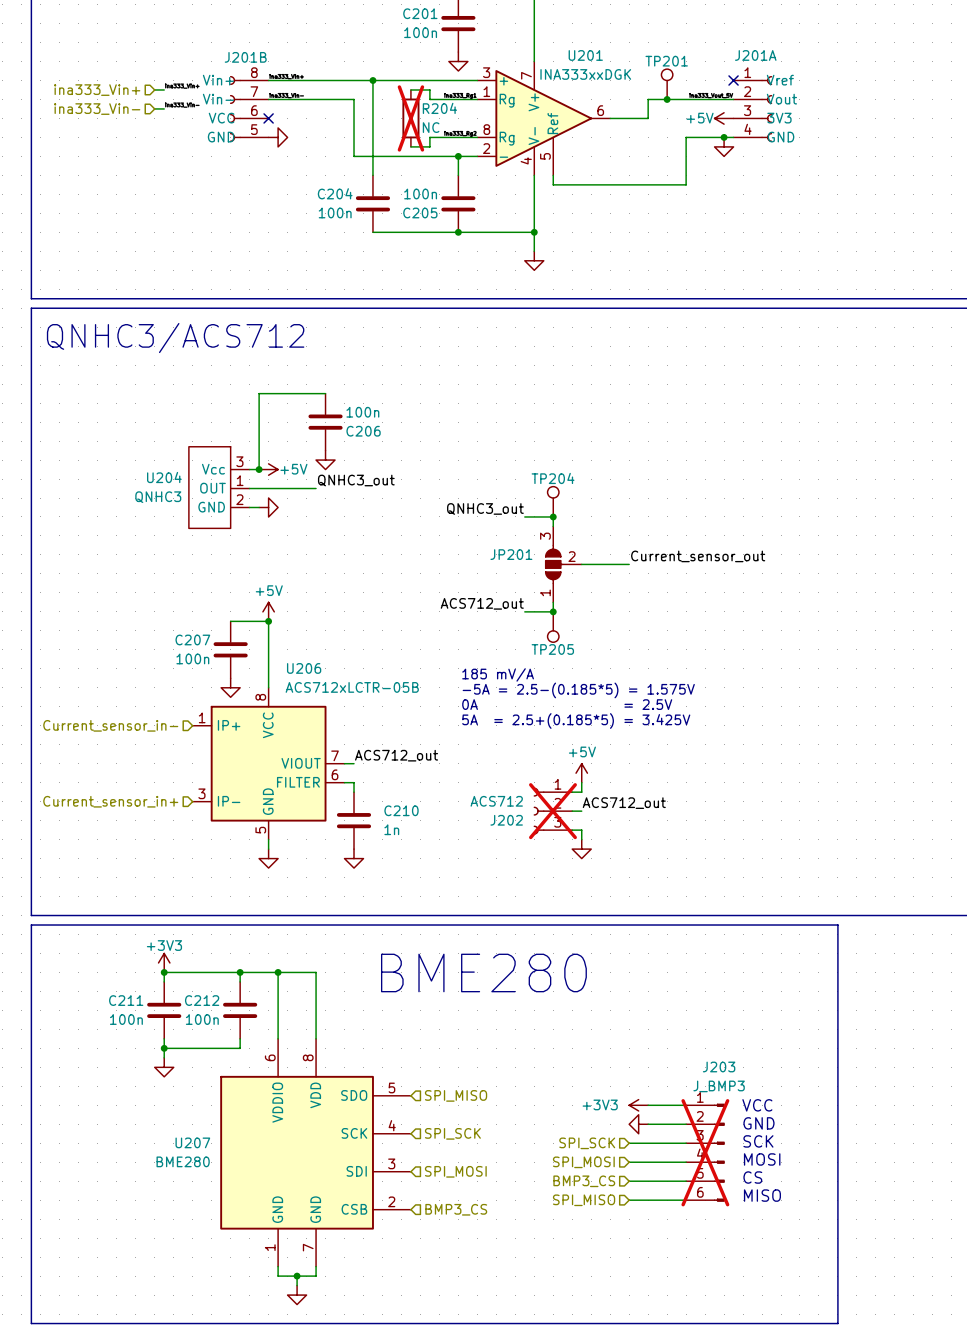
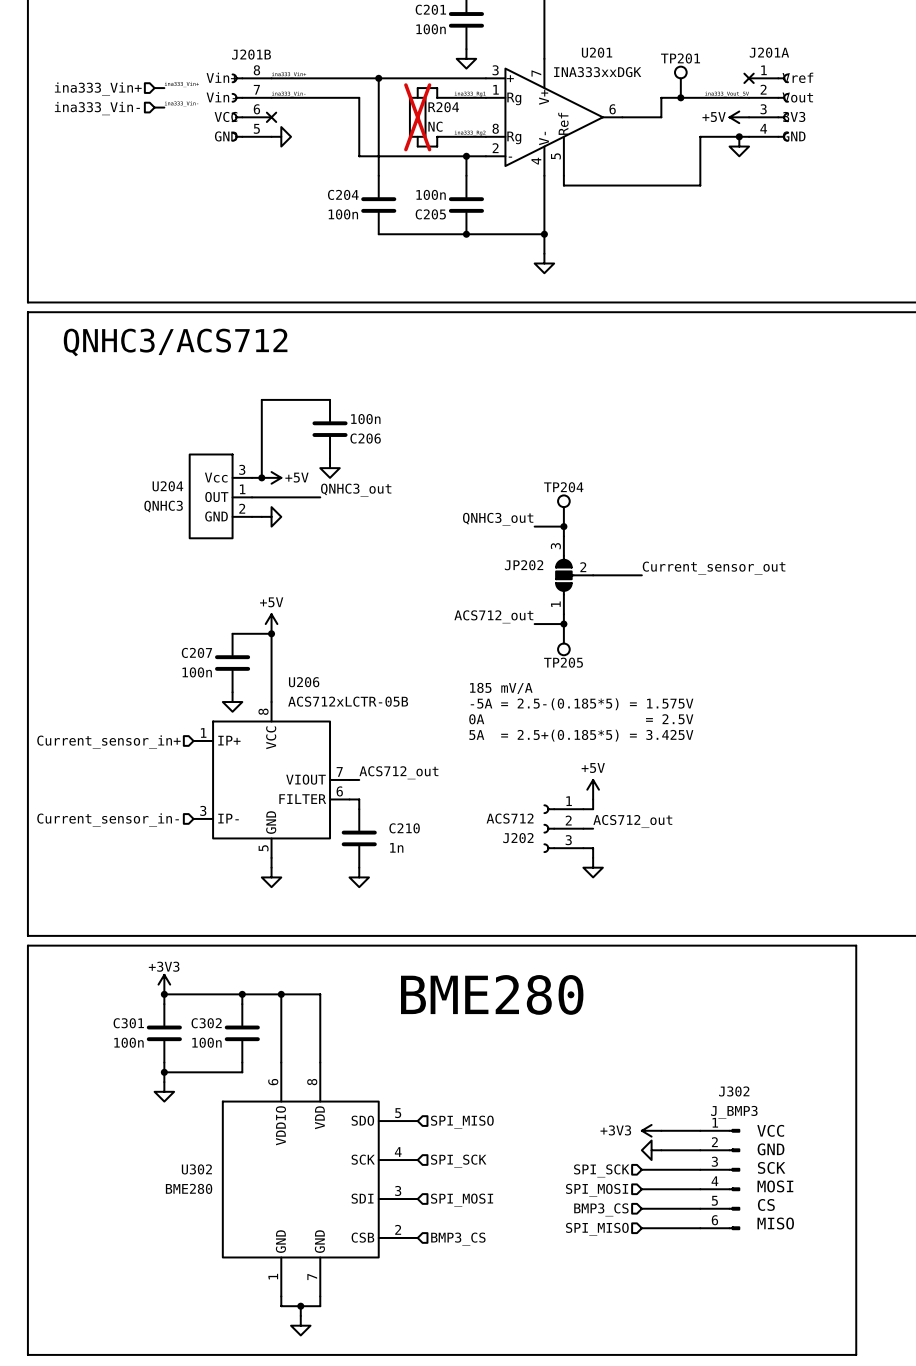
JP201 name: JP201 (511, 554) -> JP202 (524, 565)
hierarchical label: Current_sensor_in- (110, 725) -> Current_sensor_in+ (108, 742)
hierarchical label: Current_sensor_in+ (110, 801) -> Current_sensor_in- (108, 819)
J202 do-not-place cross: (552, 811) -> none
C211 name: C211 (126, 1000) -> C301 (128, 1023)
C212 name: C212 (202, 1000) -> C302 (206, 1023)
J203 name: J203 (719, 1066) -> J302 (734, 1091)
U207 name: U207 (192, 1142) -> U302 (196, 1169)
J203 do-not-place cross: (705, 1152) -> none

